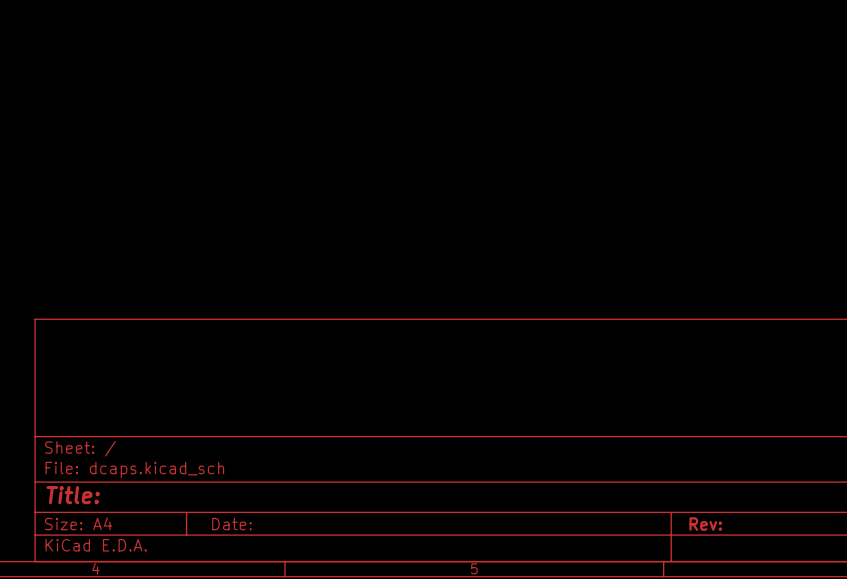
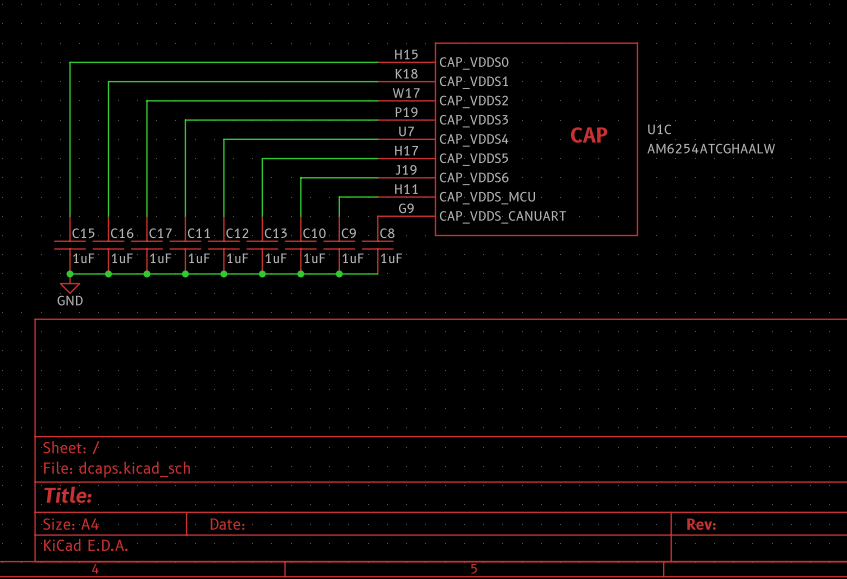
wire: none -> (377, 62) (70, 62) (70, 216)
wire: none -> (377, 81) (108, 81) (108, 216)
wire: none -> (377, 100) (146, 100) (146, 216)
wire: none -> (377, 120) (185, 120) (185, 216)
wire: none -> (377, 139) (223, 139) (223, 216)
U1C: none -> AM6254ATCGHAALW (507, 139)
wire: none -> (377, 158) (262, 158) (262, 216)
wire: none -> (377, 177) (300, 177) (300, 216)
wire: none -> (377, 197) (339, 197) (339, 216)
C15: none -> (70, 245)
C16: none -> (108, 245)
C17: none -> (146, 245)
C11: none -> (185, 245)
C12: none -> (223, 245)
C13: none -> (262, 245)
C10: none -> (300, 245)
C9: none -> (339, 245)
C8: none -> (377, 245)
wire: none -> (70, 273) (377, 273)
junction: none -> (70, 273)
junction: none -> (108, 273)
junction: none -> (146, 273)
junction: none -> (185, 273)
junction: none -> (223, 273)
junction: none -> (262, 273)
junction: none -> (300, 273)
junction: none -> (339, 273)
power symbol: none -> GND (70, 283)

